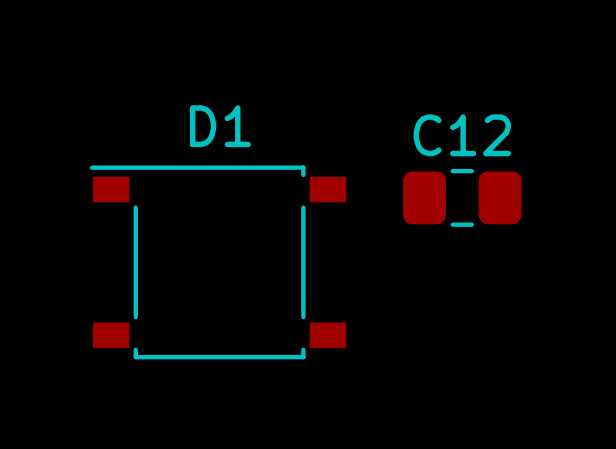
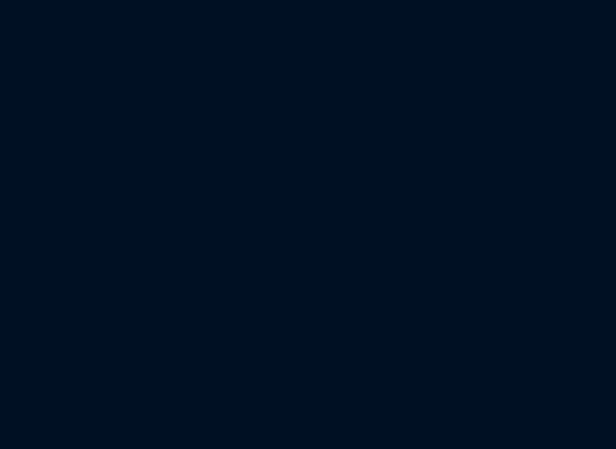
C12: (462, 197) -> none
D1: (218, 262) -> none

